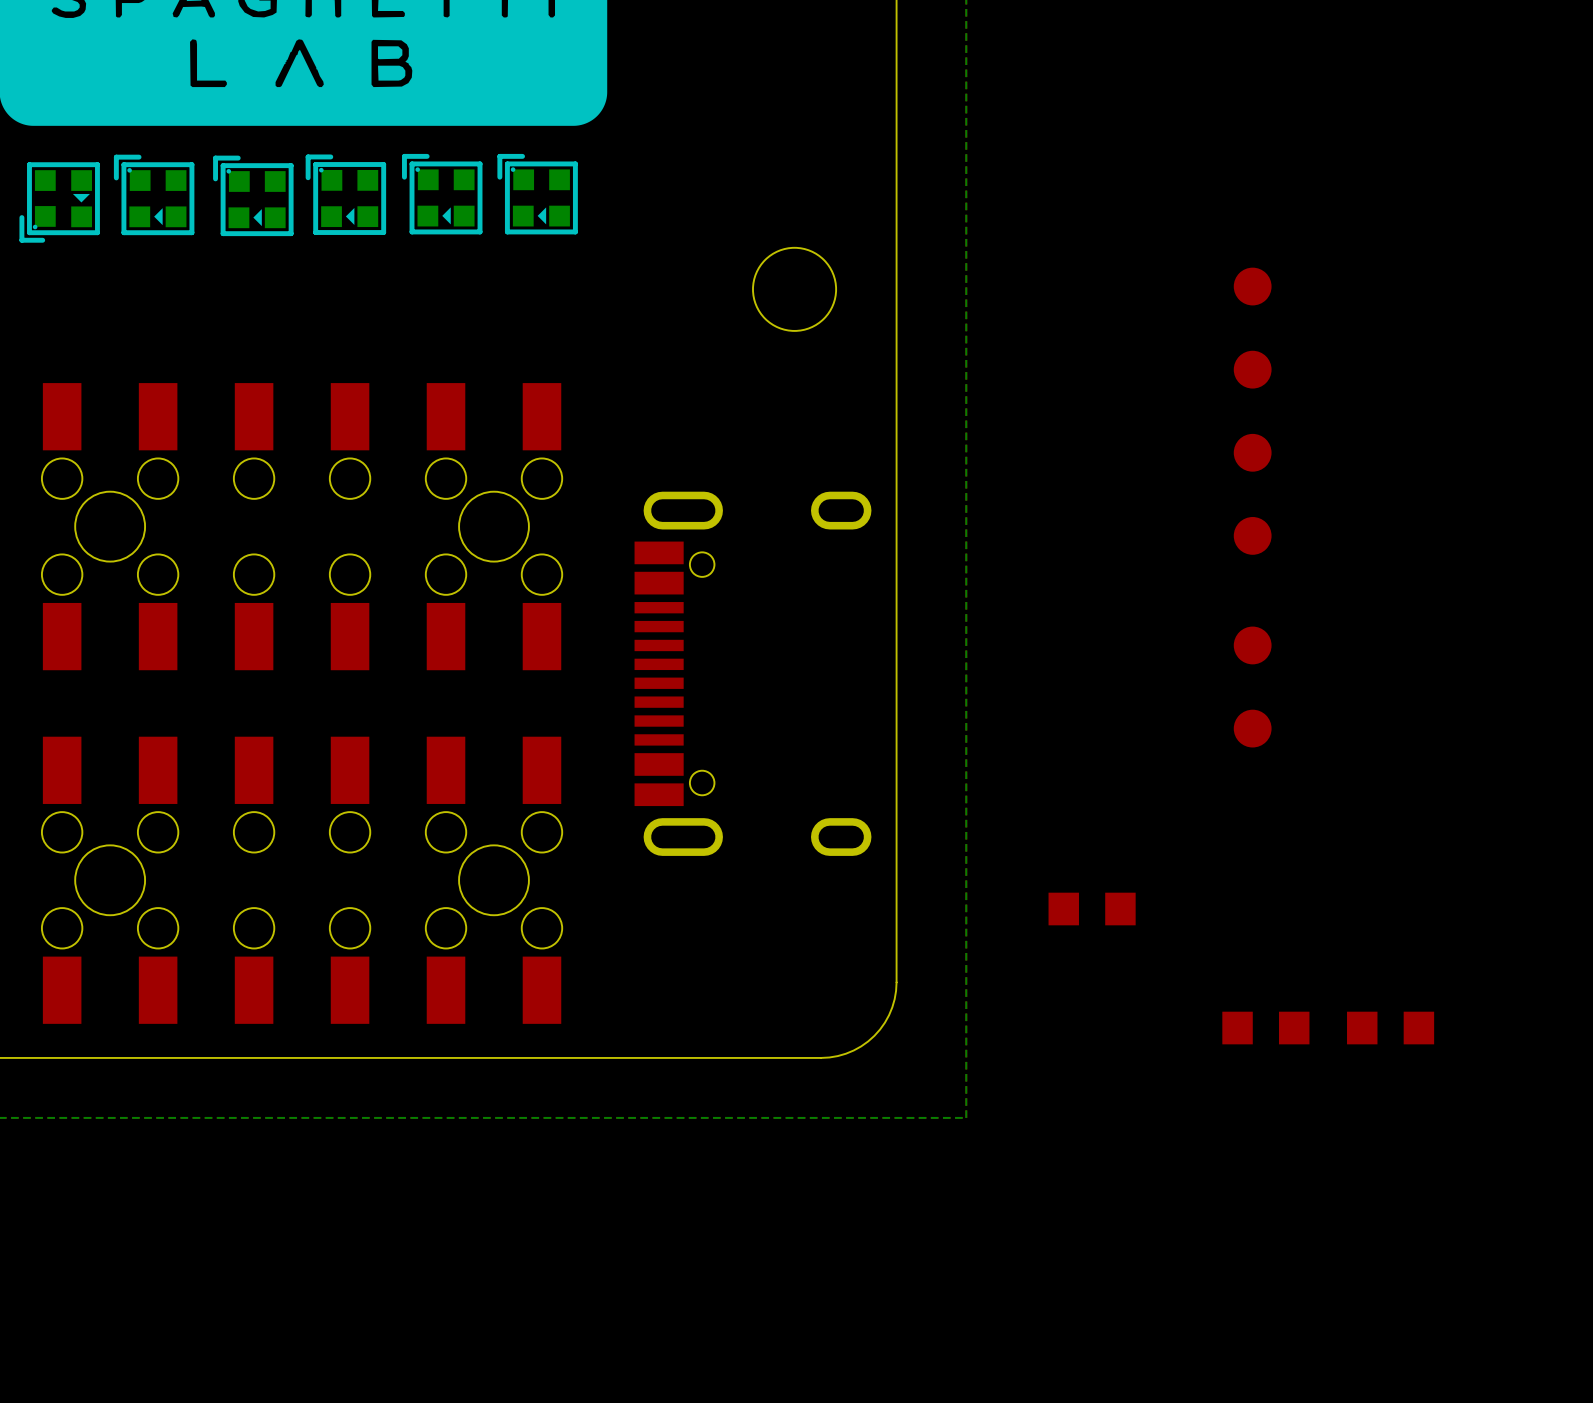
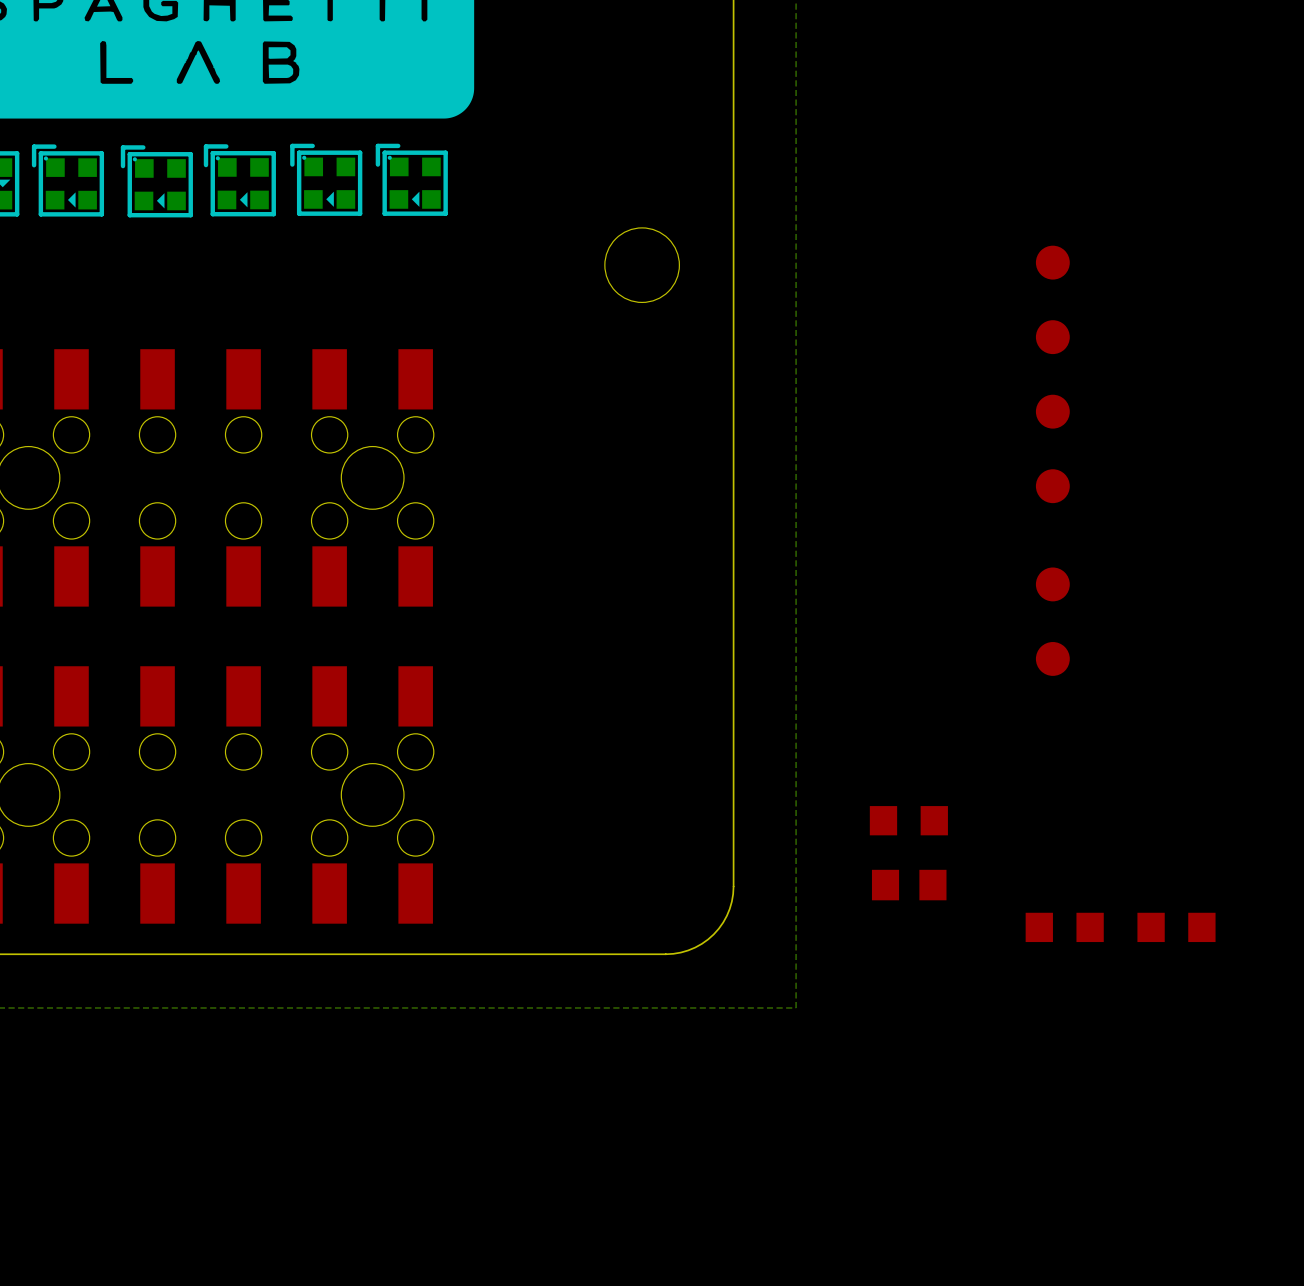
part: (753, 673) -> none
part: none -> (909, 885)

